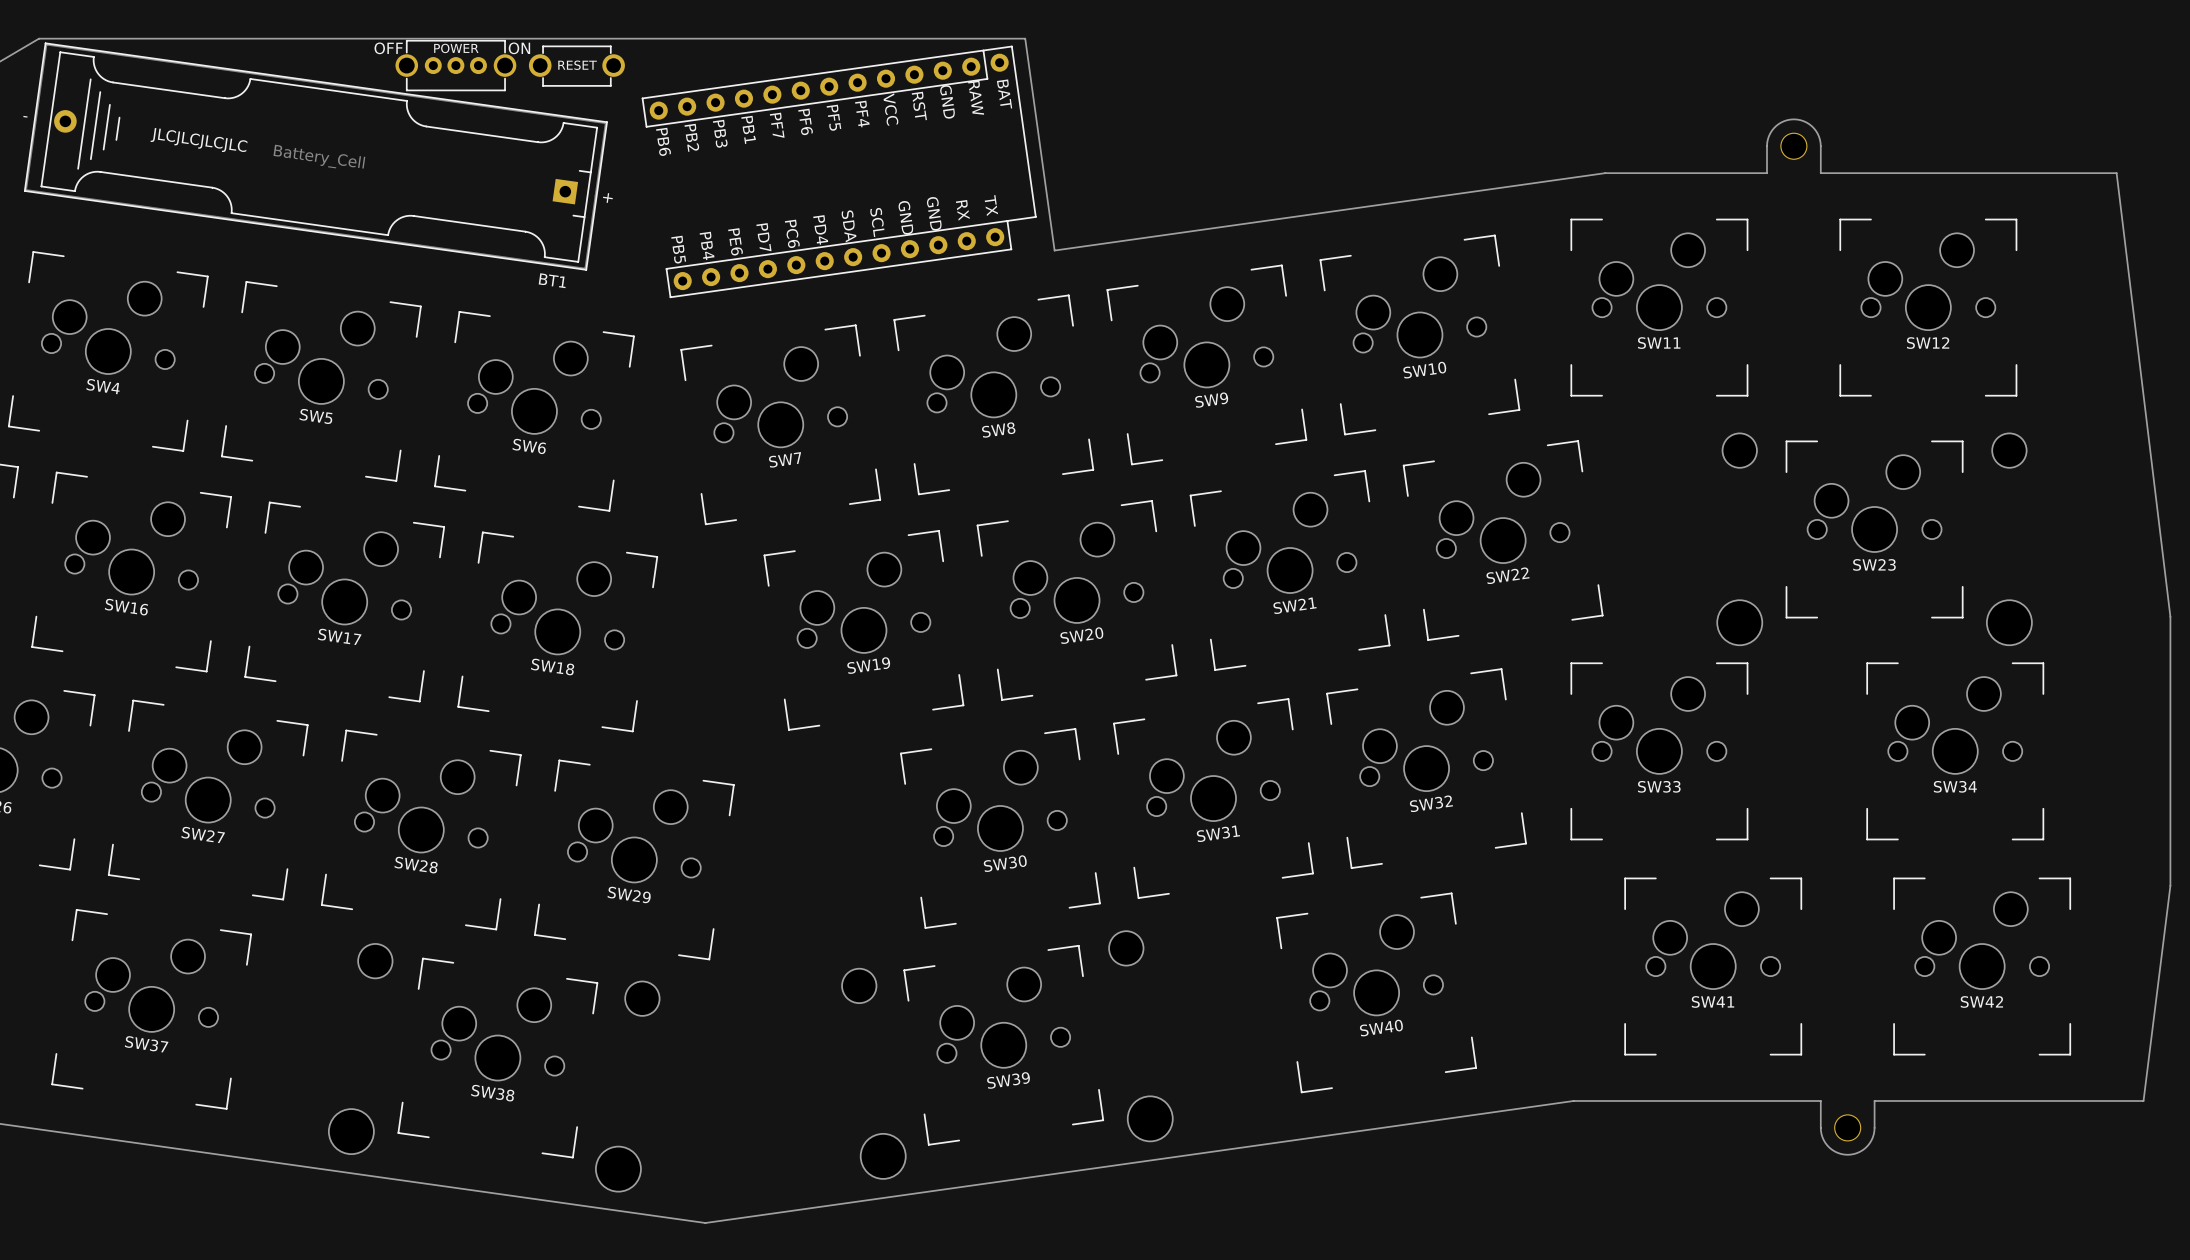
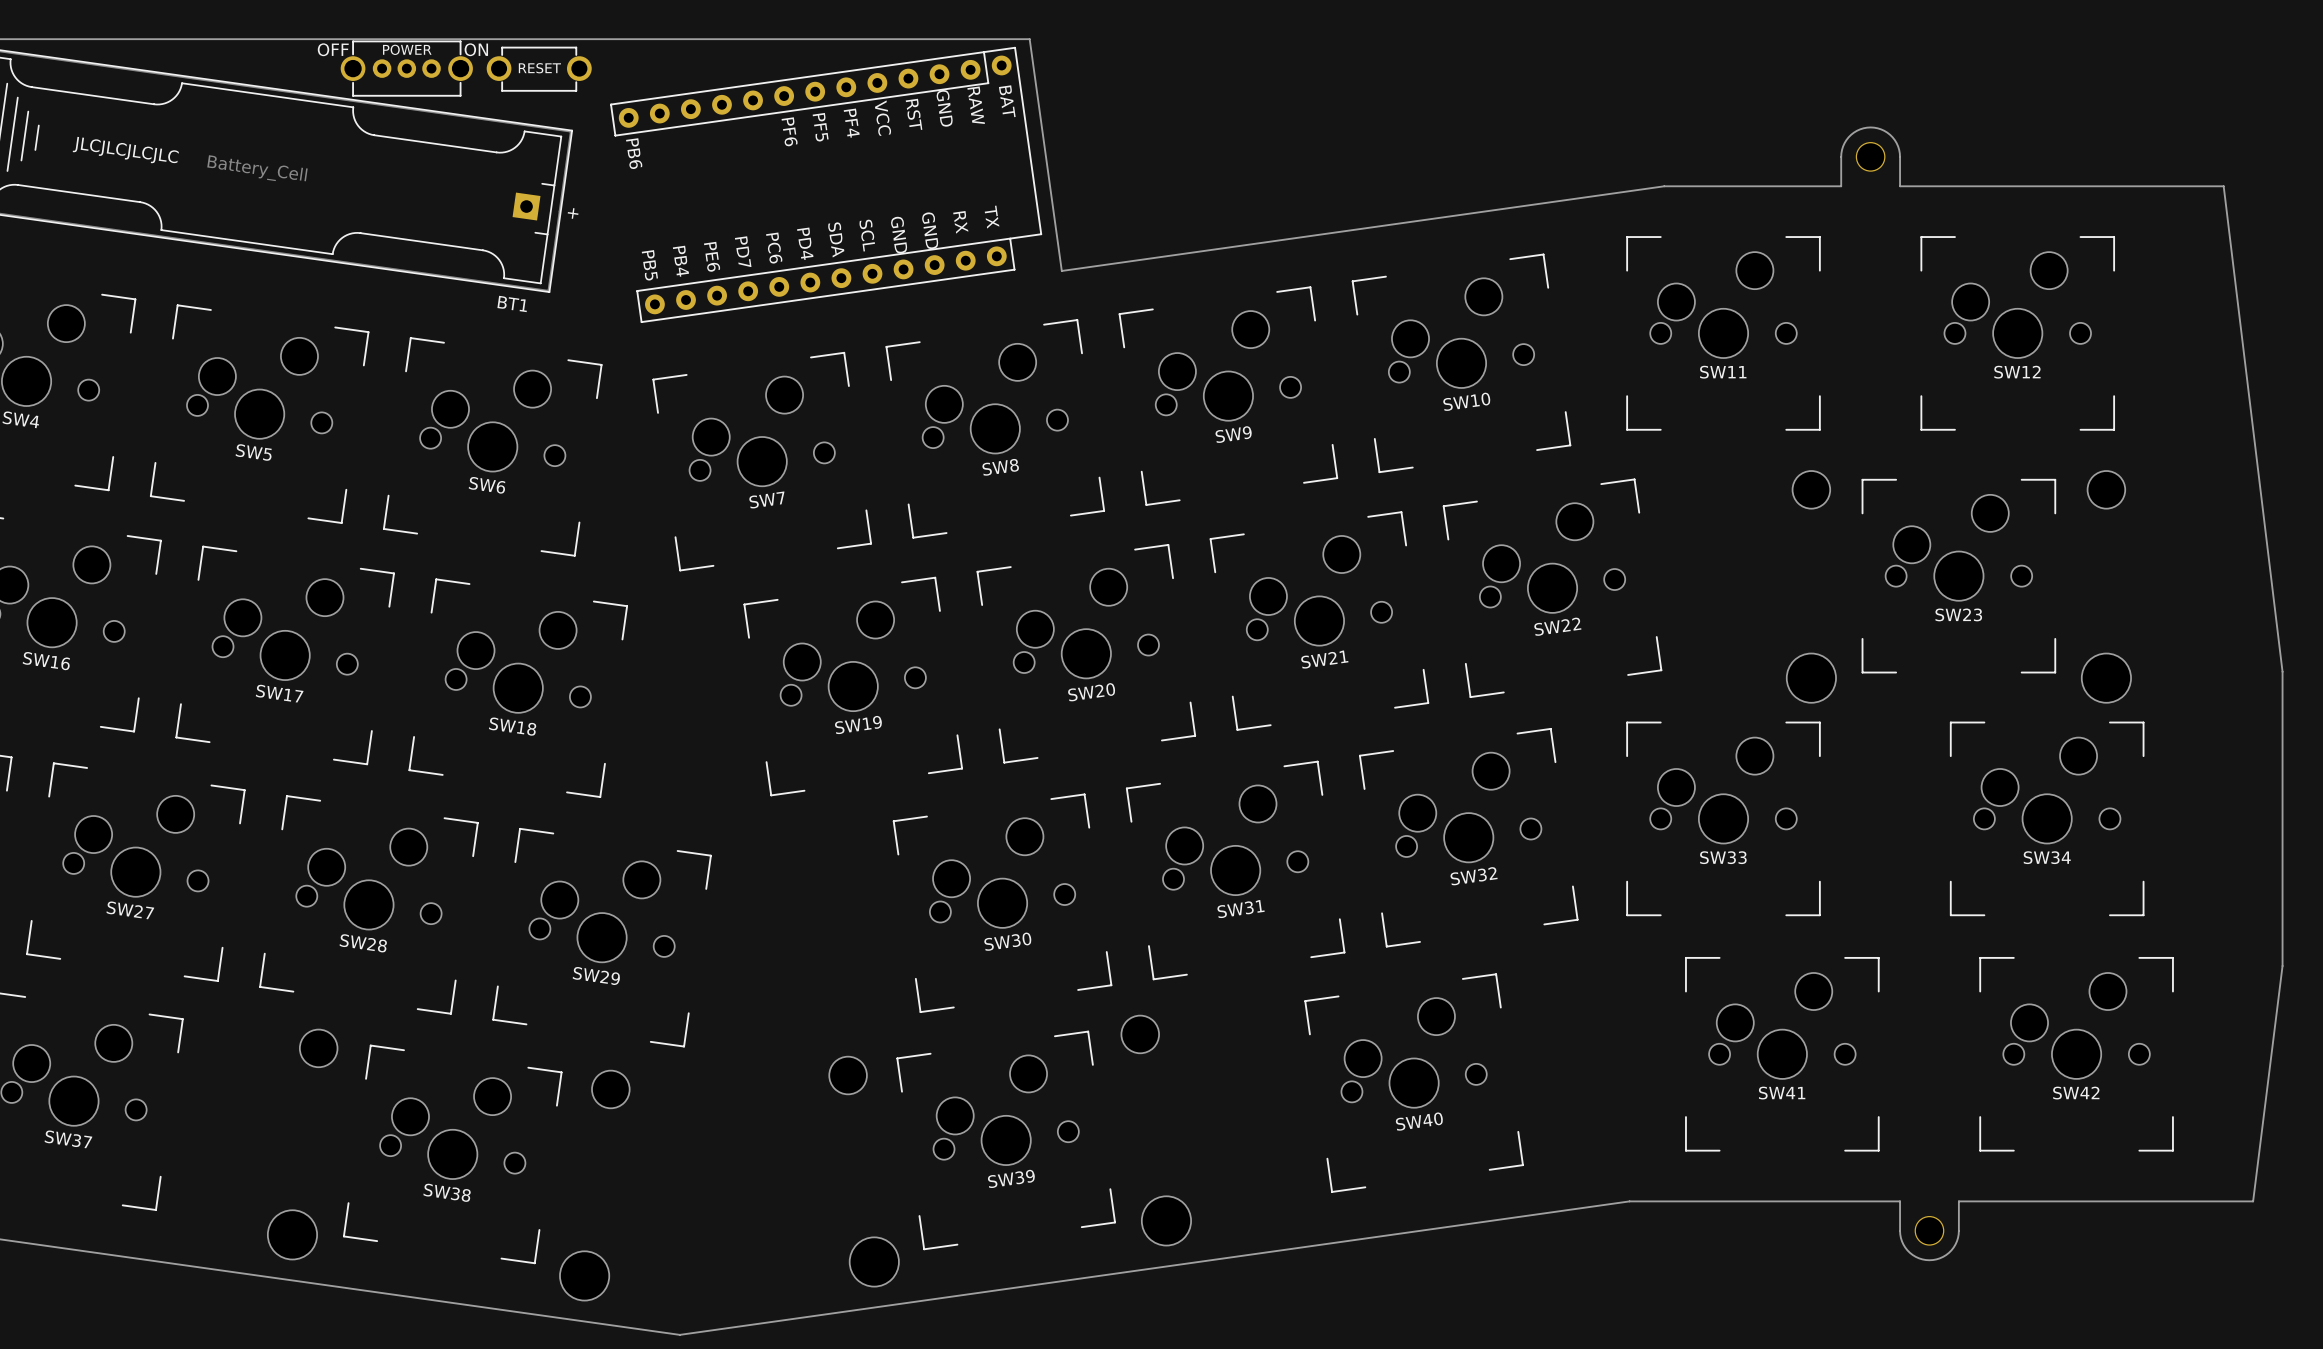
part footprint: [641, 45, 1037, 299] -> [610, 46, 1043, 324]

